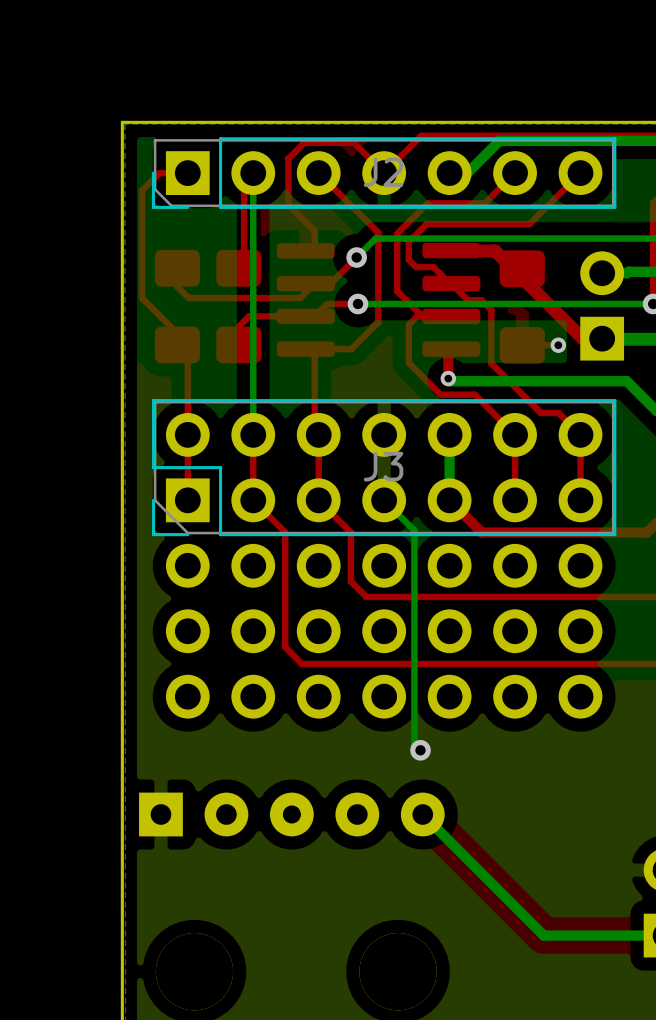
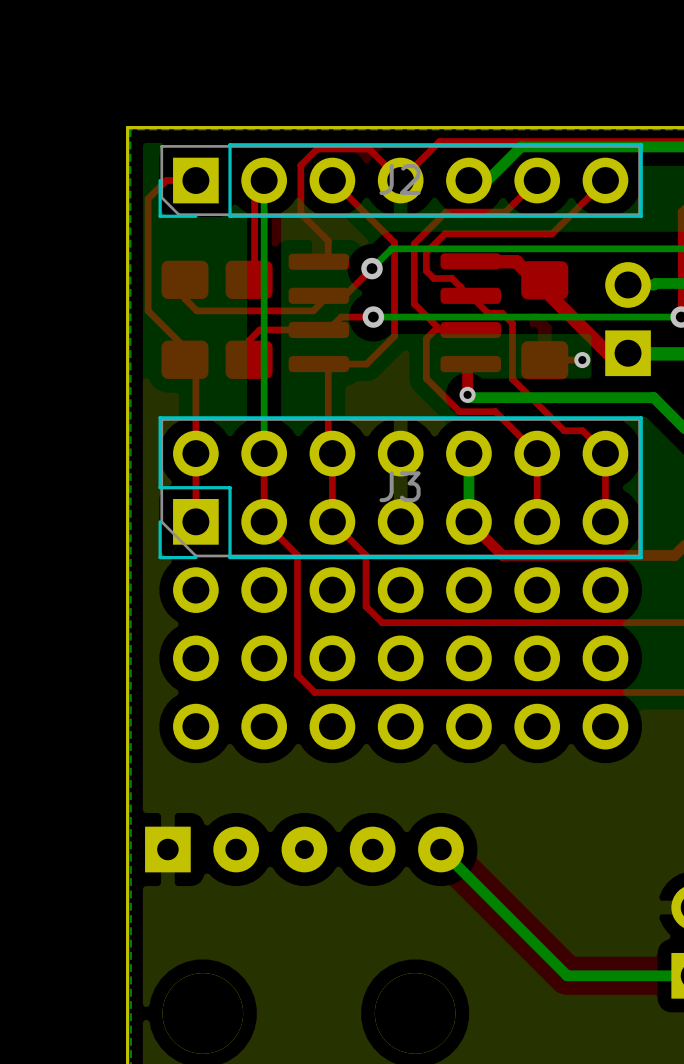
bottom track: (384, 500) (414, 530) (414, 744) (420, 750) -> none
via: (420, 750) -> none

